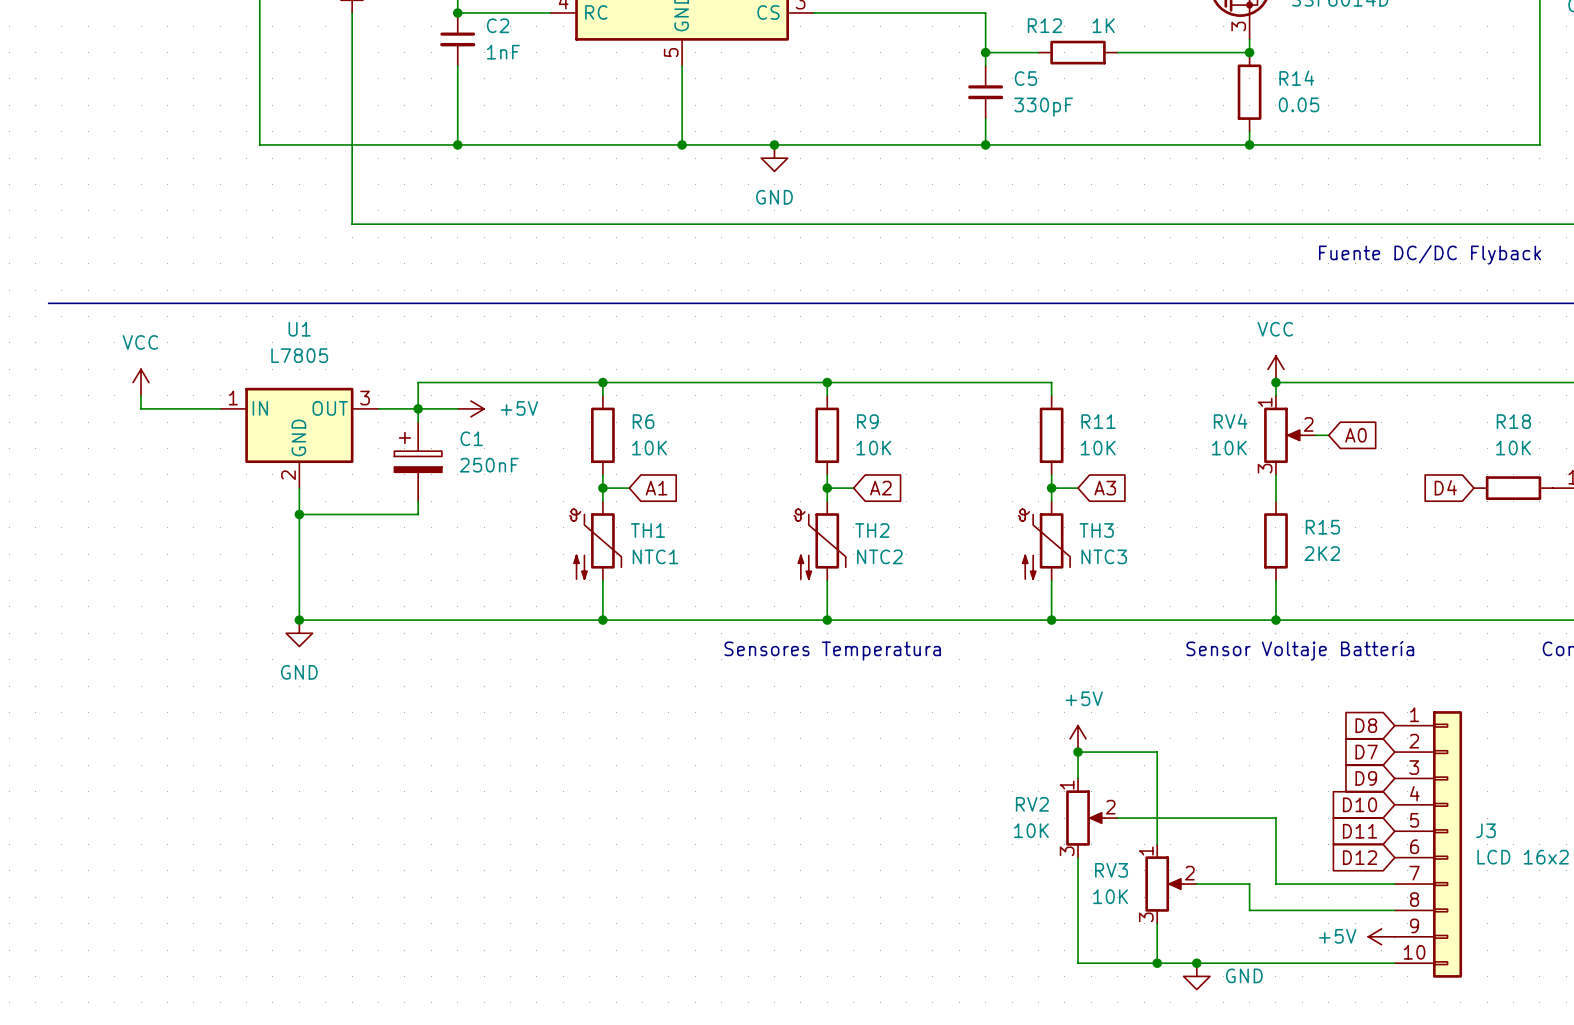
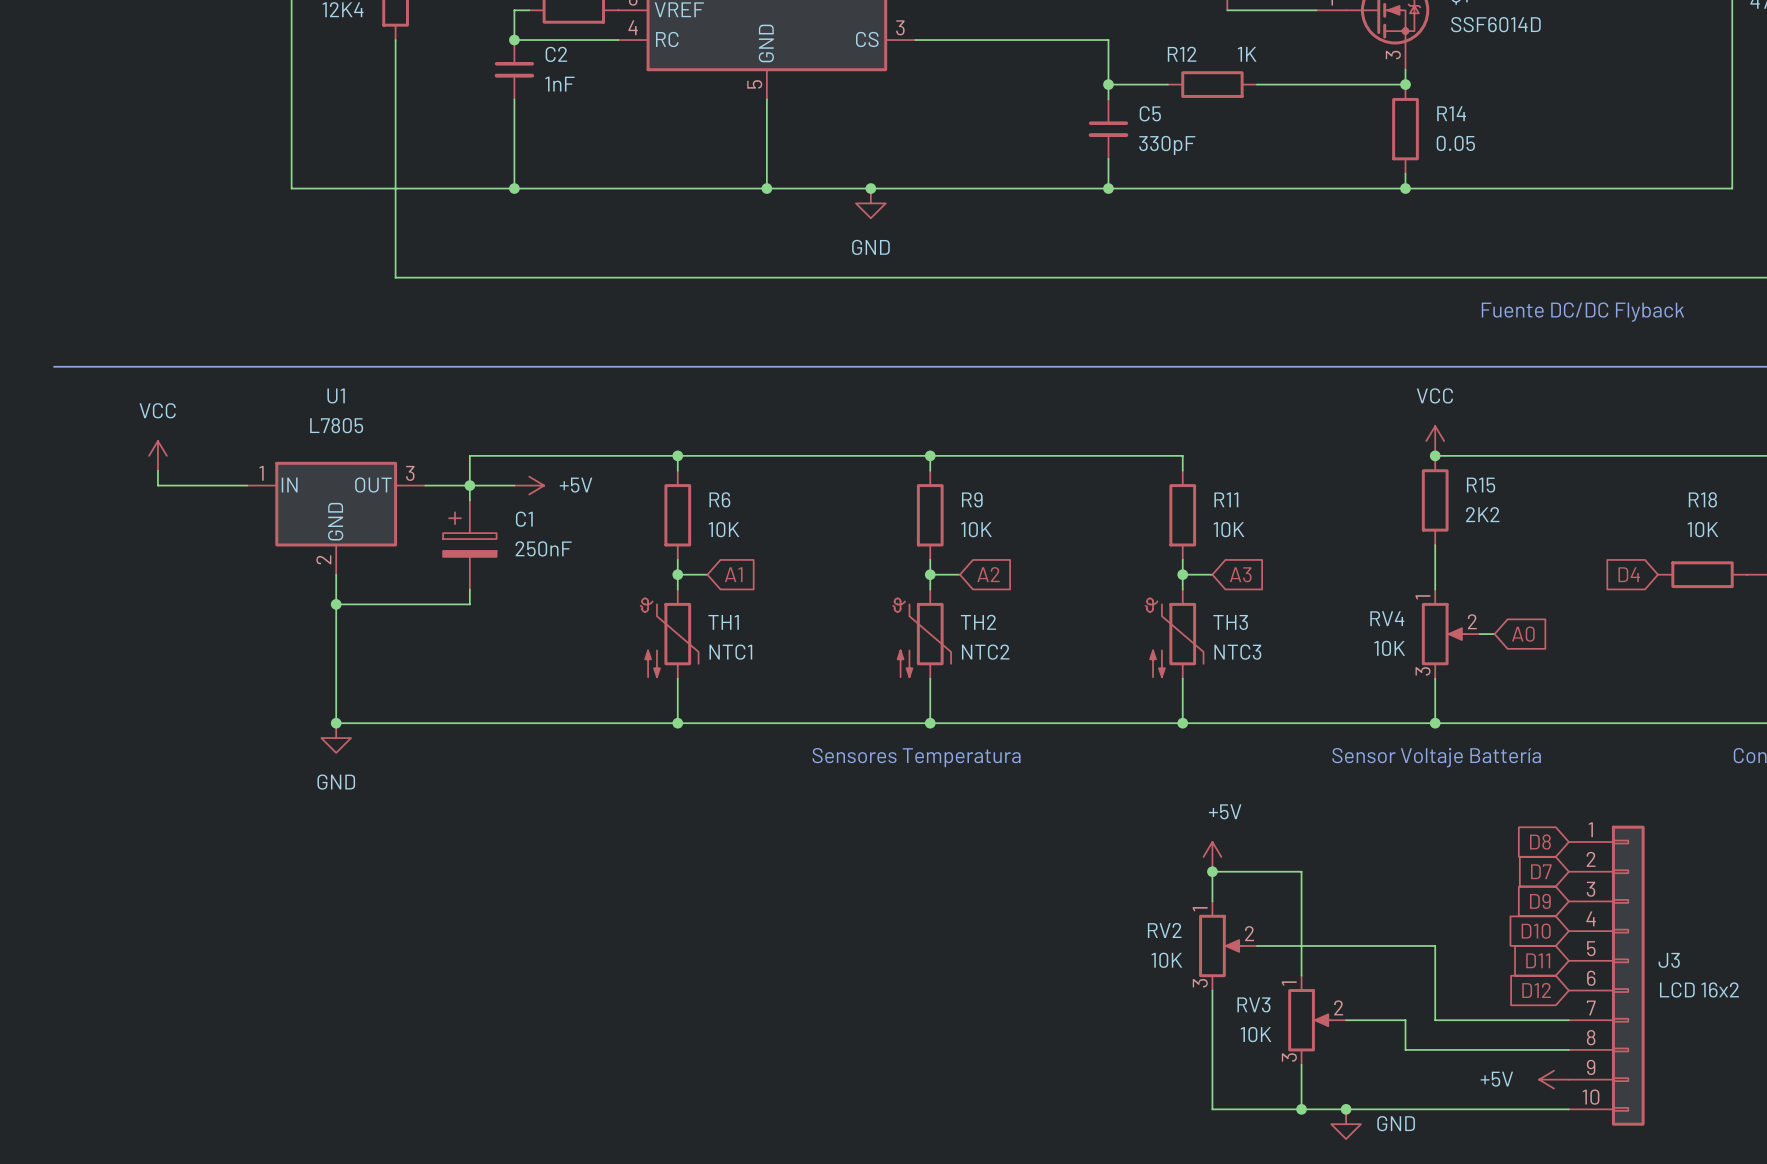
RV4 position: (1289, 435) -> (1450, 634)
wire: (1315, 435) (1328, 435) -> (1479, 634) (1494, 634)
global label position: A0 (1355, 435) -> A0 (1523, 634)
R15 position: (1275, 540) -> (1435, 500)

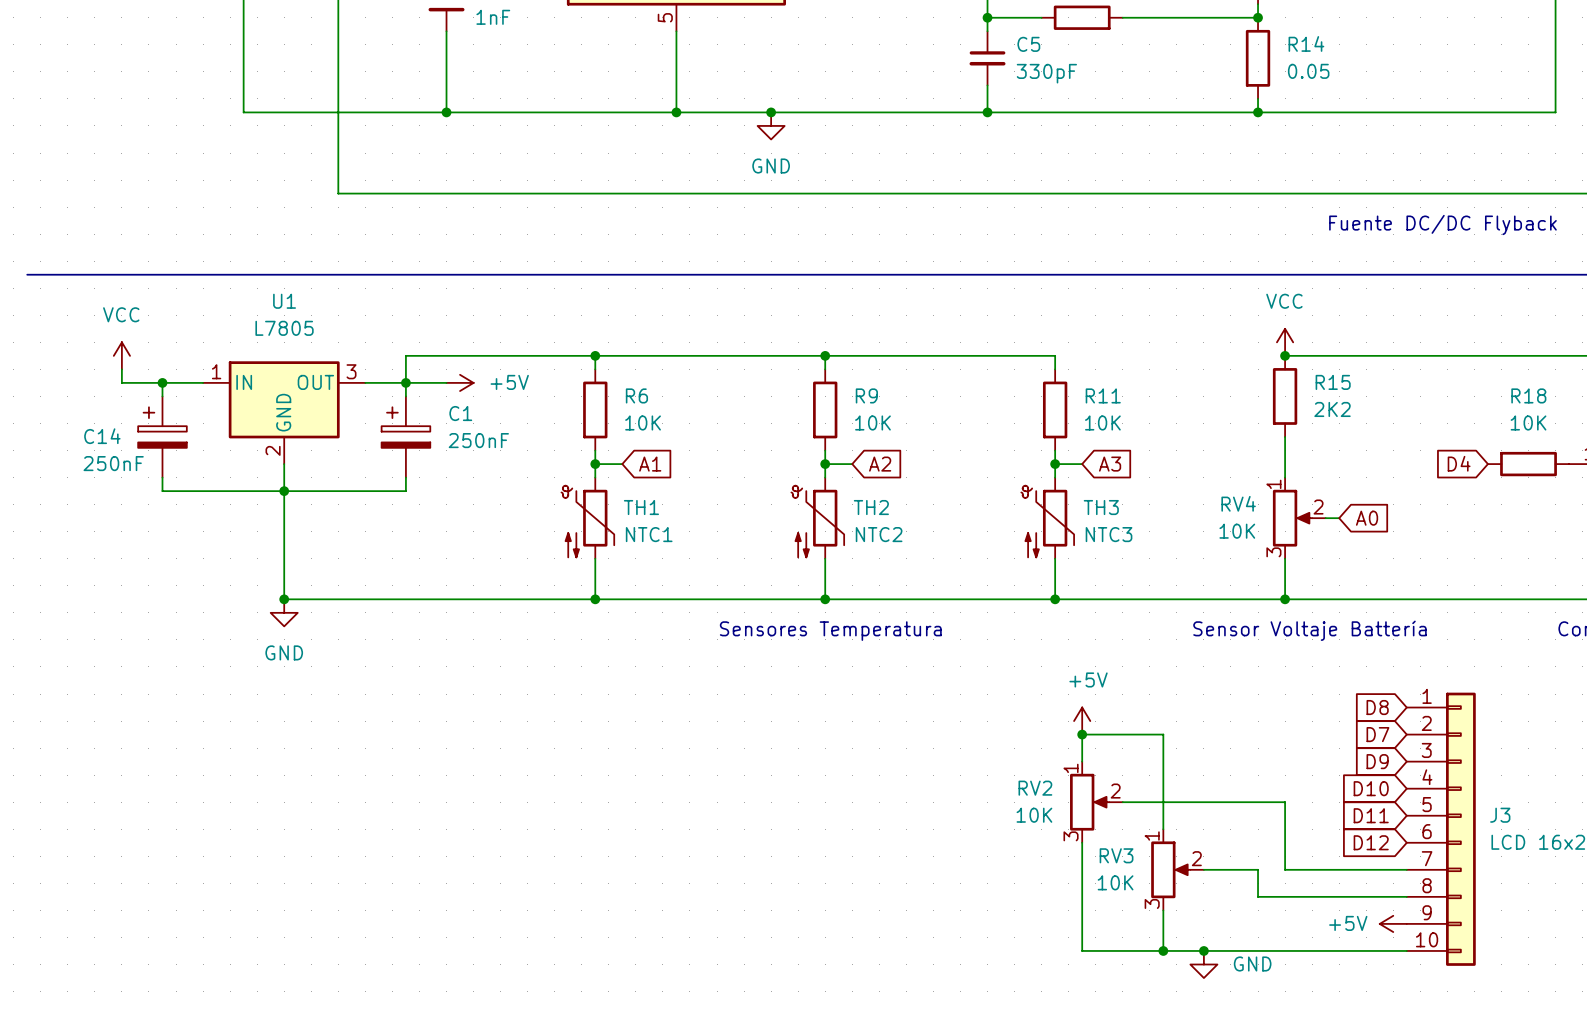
wire: none -> (162, 382) (162, 396)
junction: none -> (162, 382)
C14: none -> 250nF (162, 437)
wire: none -> (162, 477) (162, 491) (284, 491)

